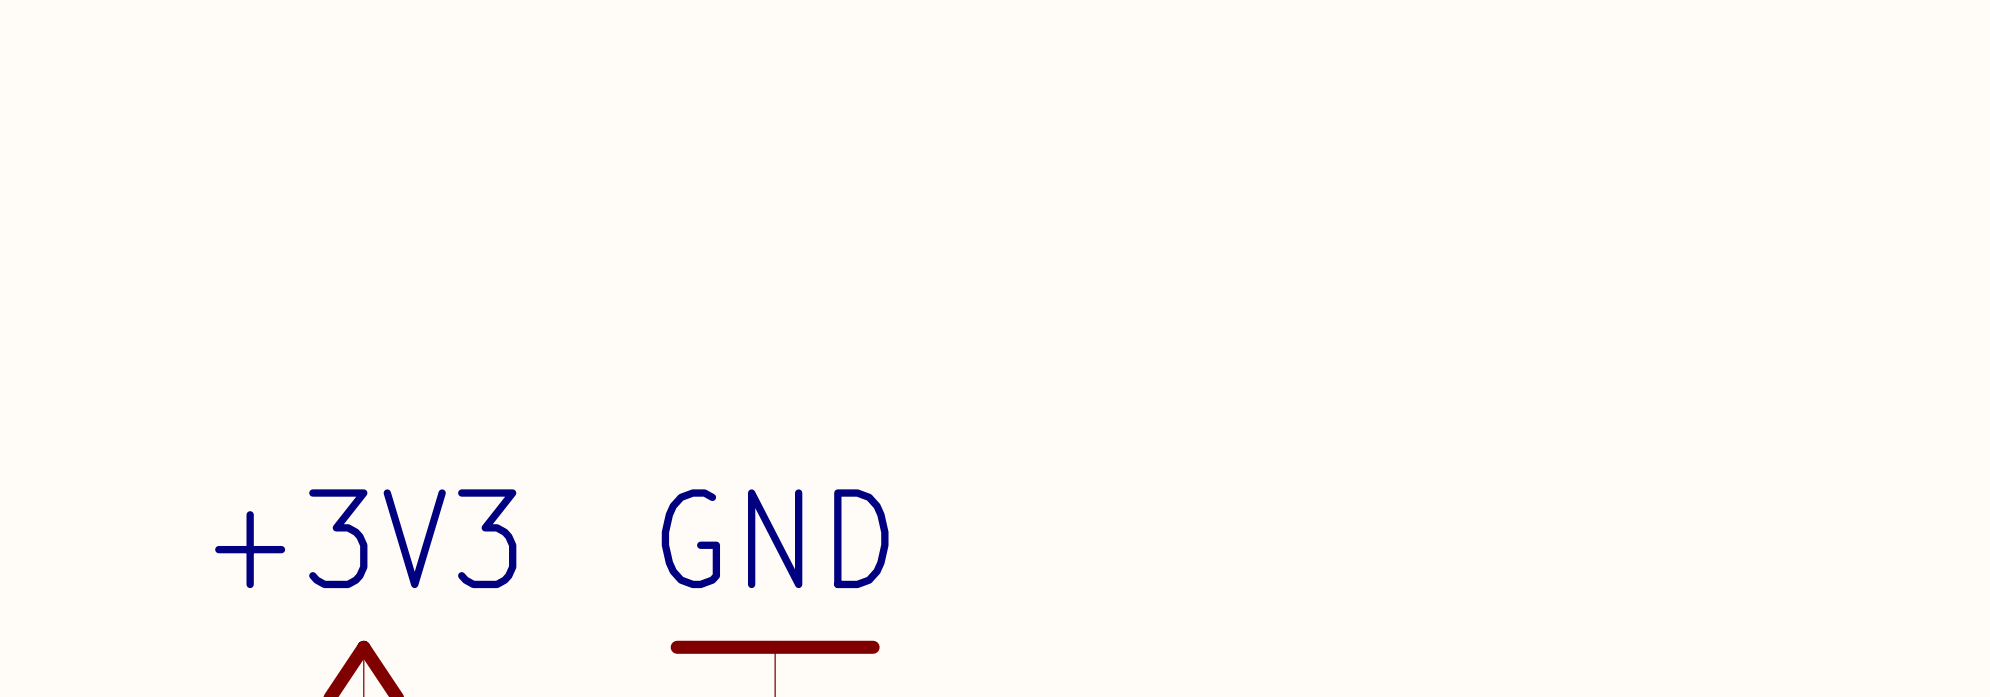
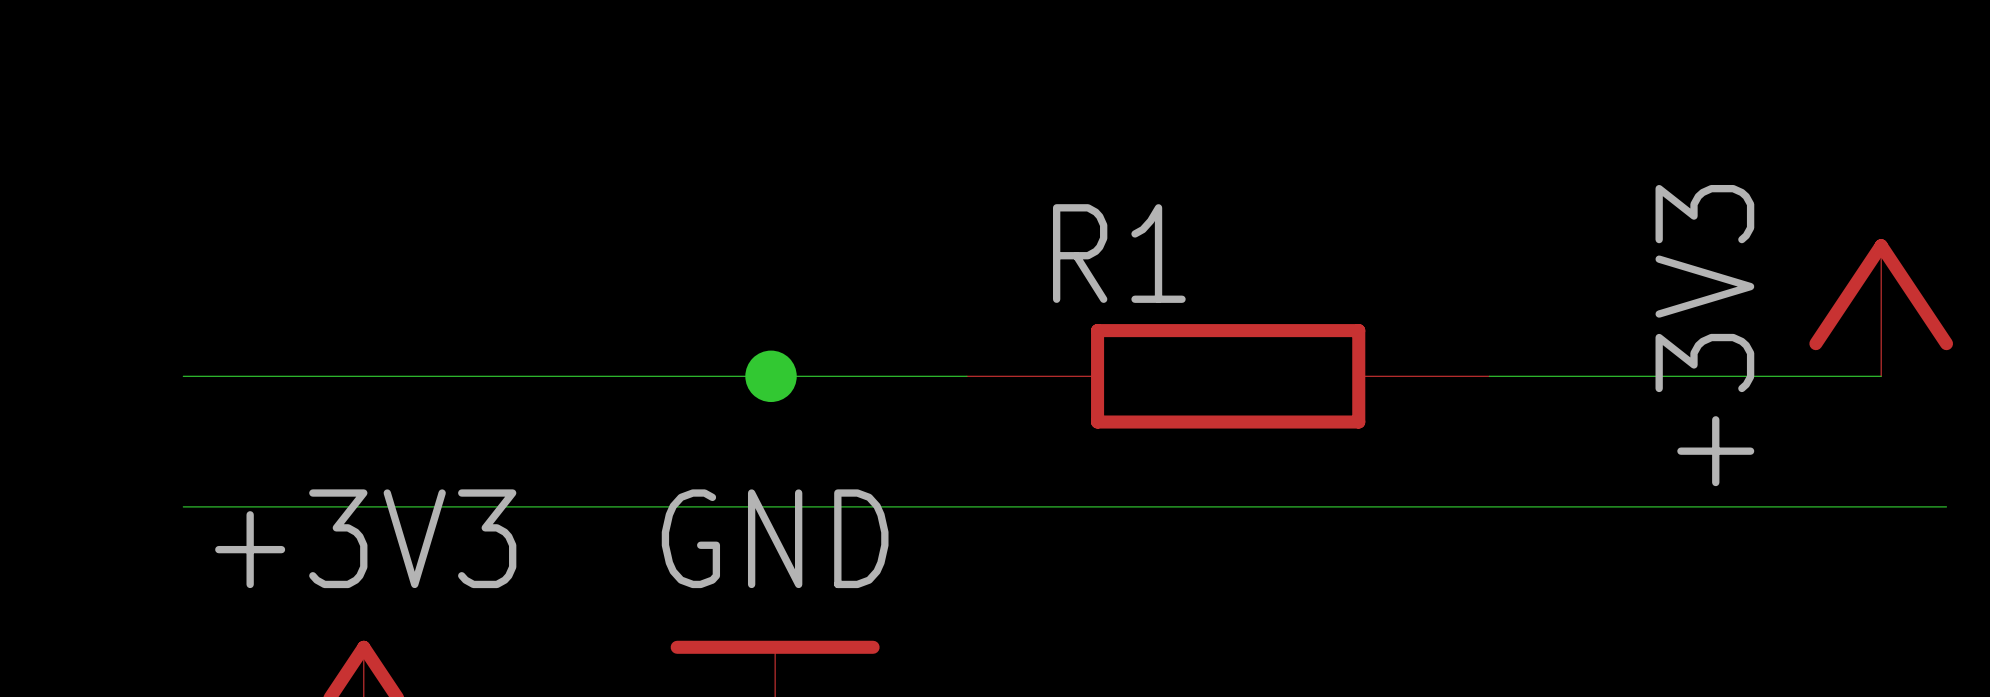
power symbol: none -> +3V3 (1881, 307)
wire: none -> (183, 376) (966, 376)
junction: none -> (771, 376)
R1: none -> (1228, 376)
wire: none -> (1489, 376) (1881, 376)
wire: none -> (183, 506) (1946, 506)

